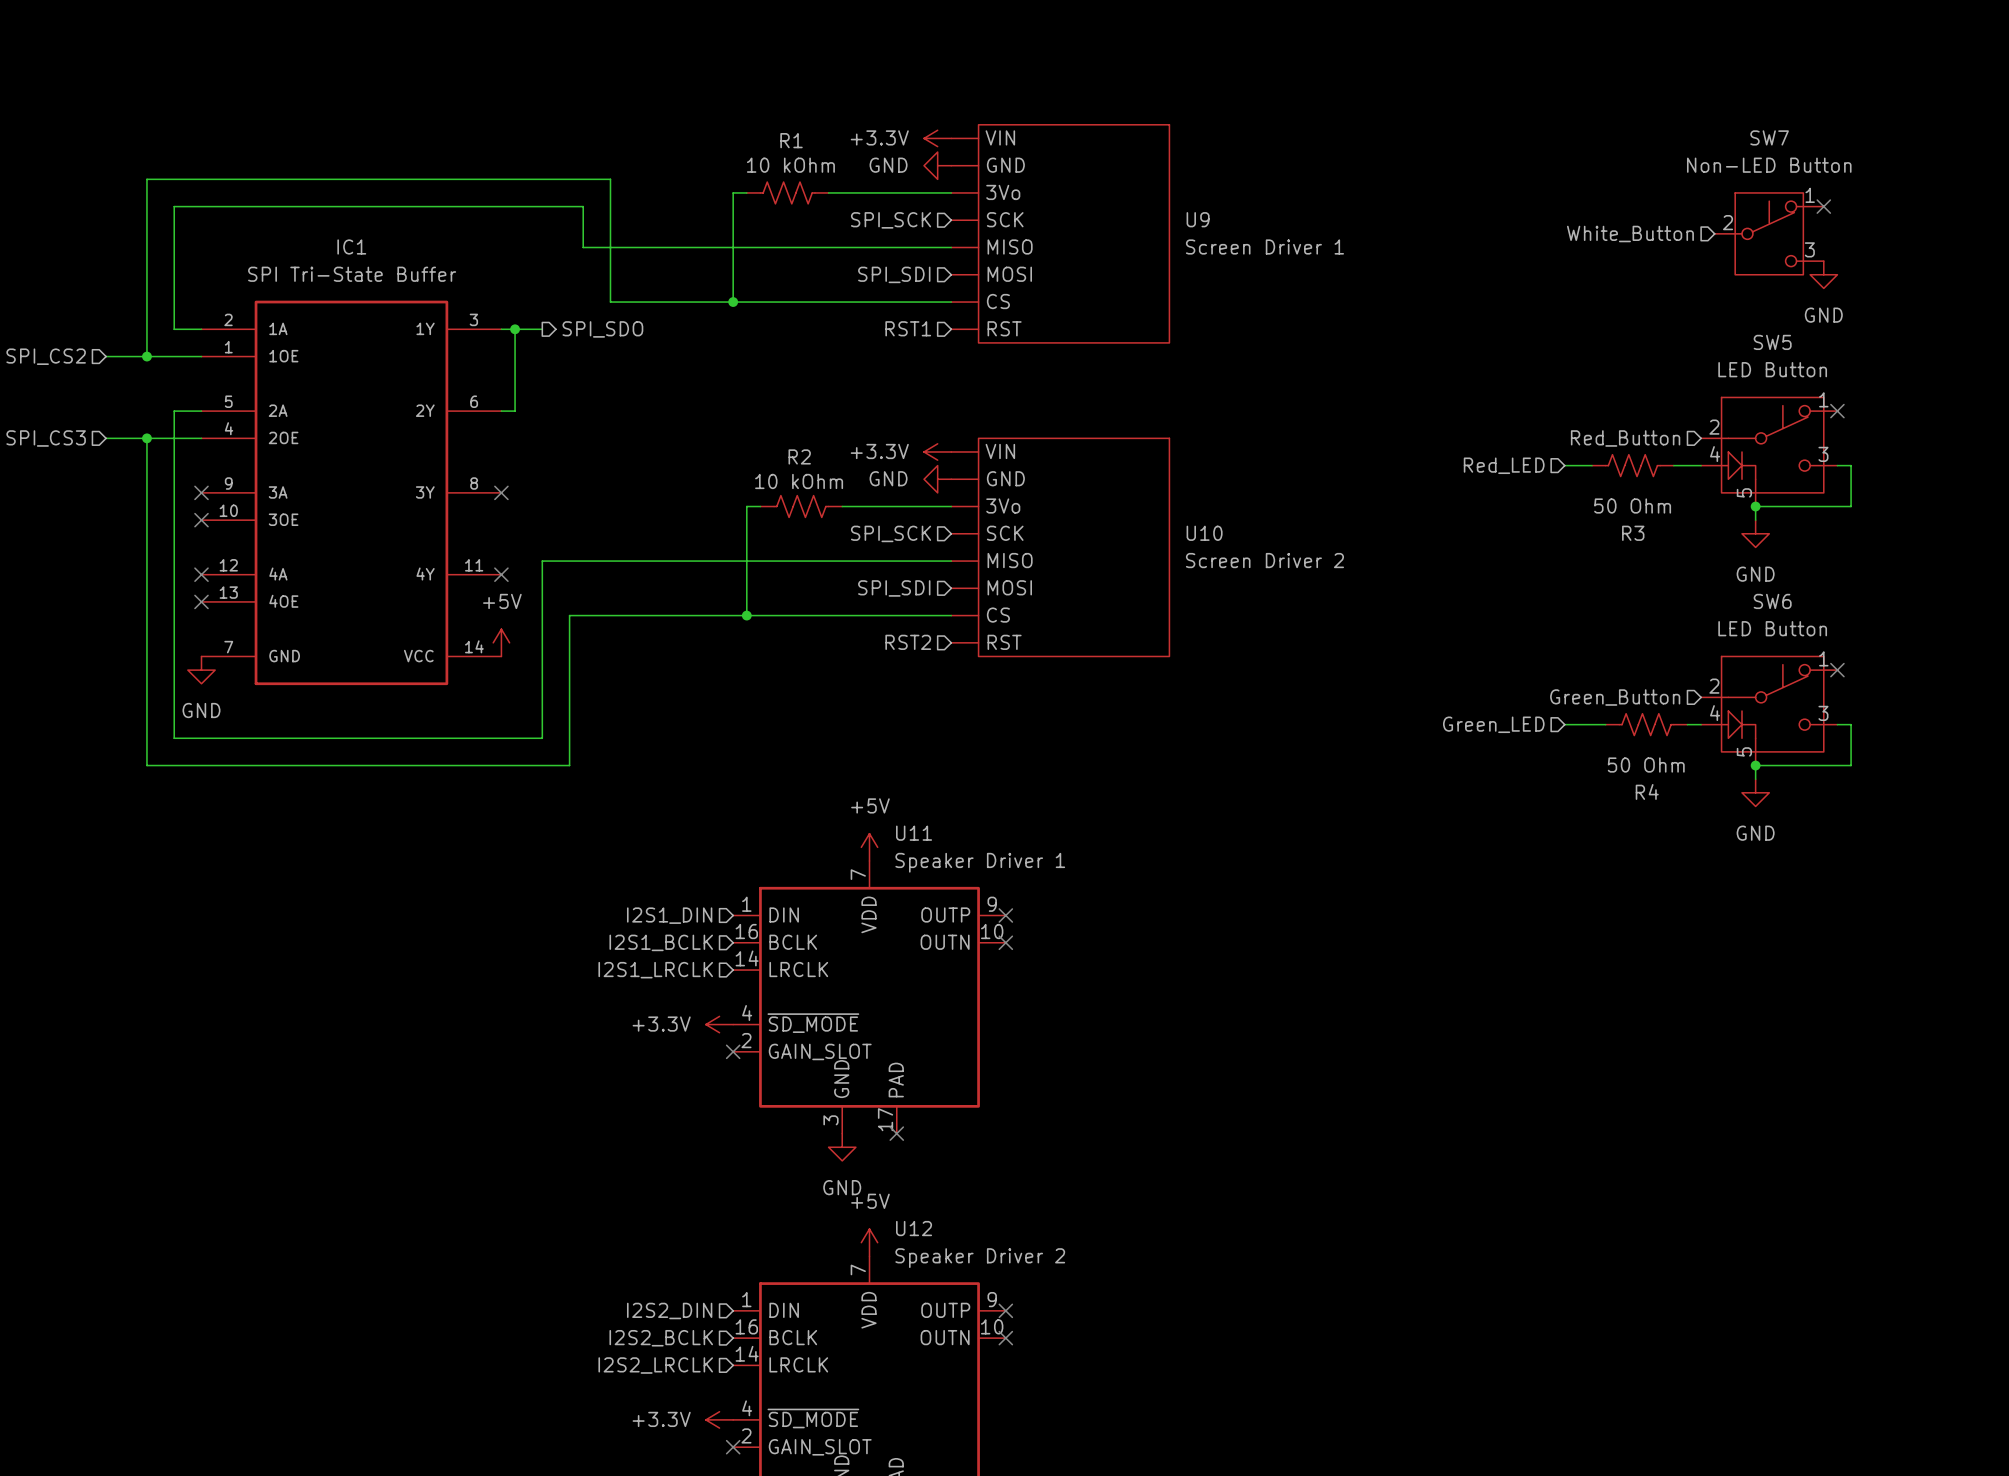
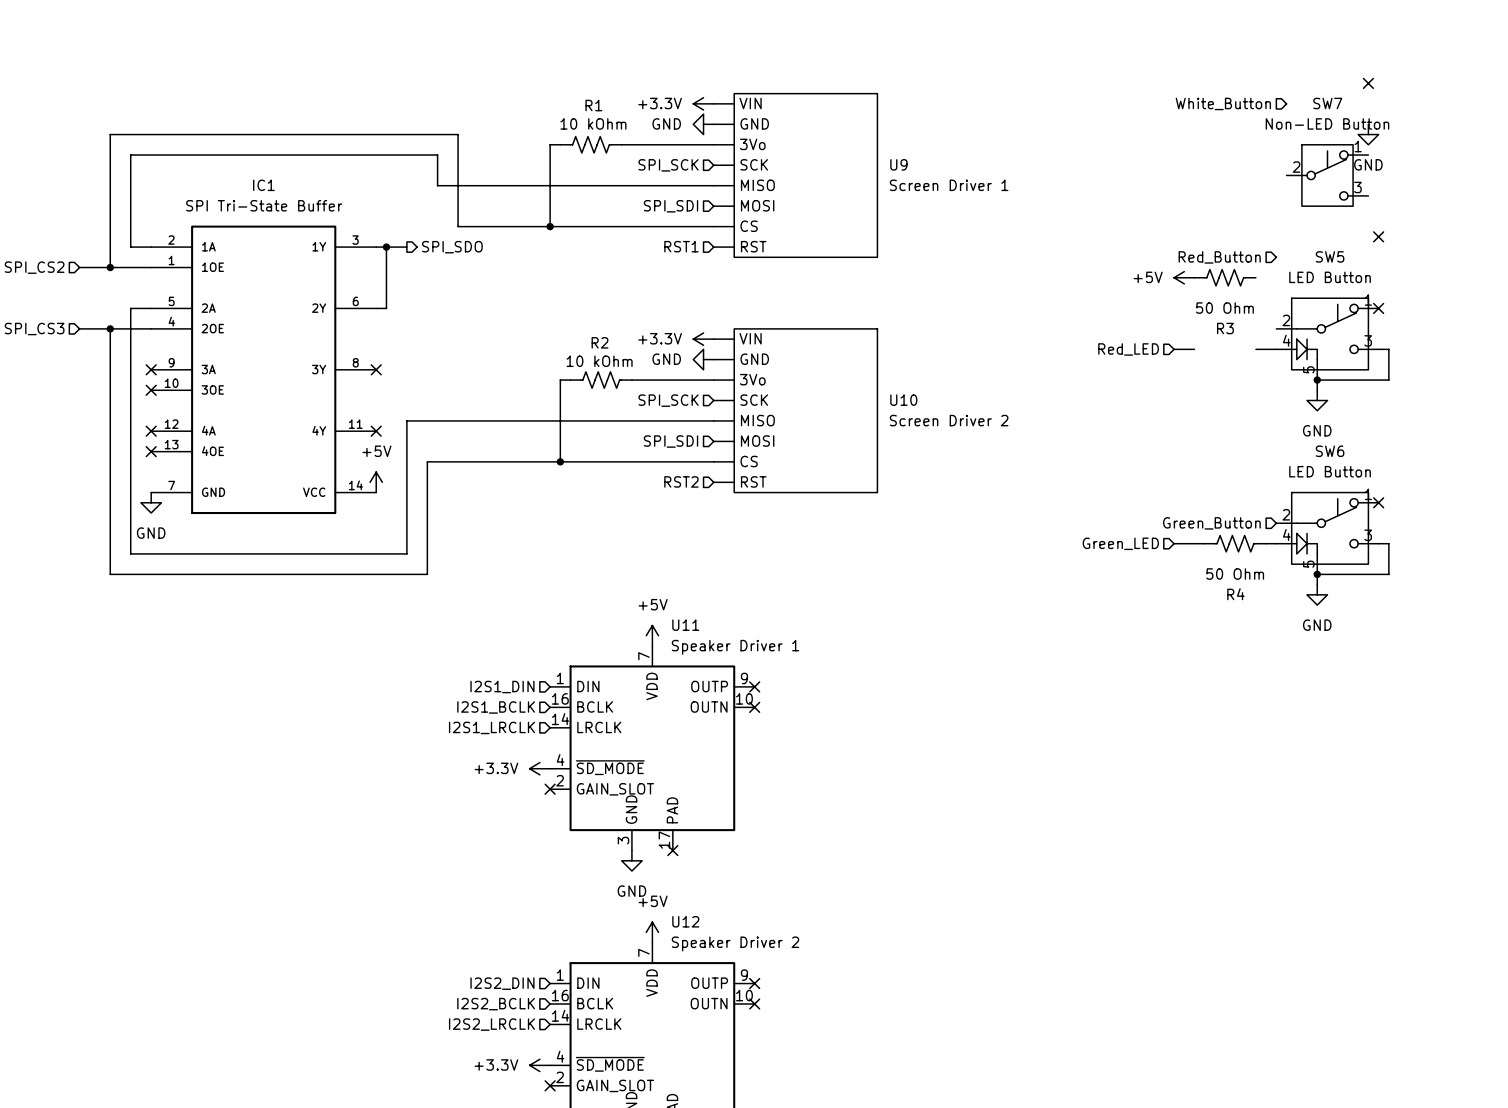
no-connect mark: none -> (1368, 83)
no-connect mark: (1823, 206) -> none
hierarchical label position: White_Button (1630, 234) -> White_Button (1223, 103)
power symbol position: GND (1823, 274) -> GND (1368, 134)
no-connect mark: none -> (1378, 236)
power symbol: none -> +5V (1184, 277)
hierarchical label position: Red_Button (1625, 438) -> Red_Button (1219, 257)
R3 position: (1632, 465) -> (1225, 277)

